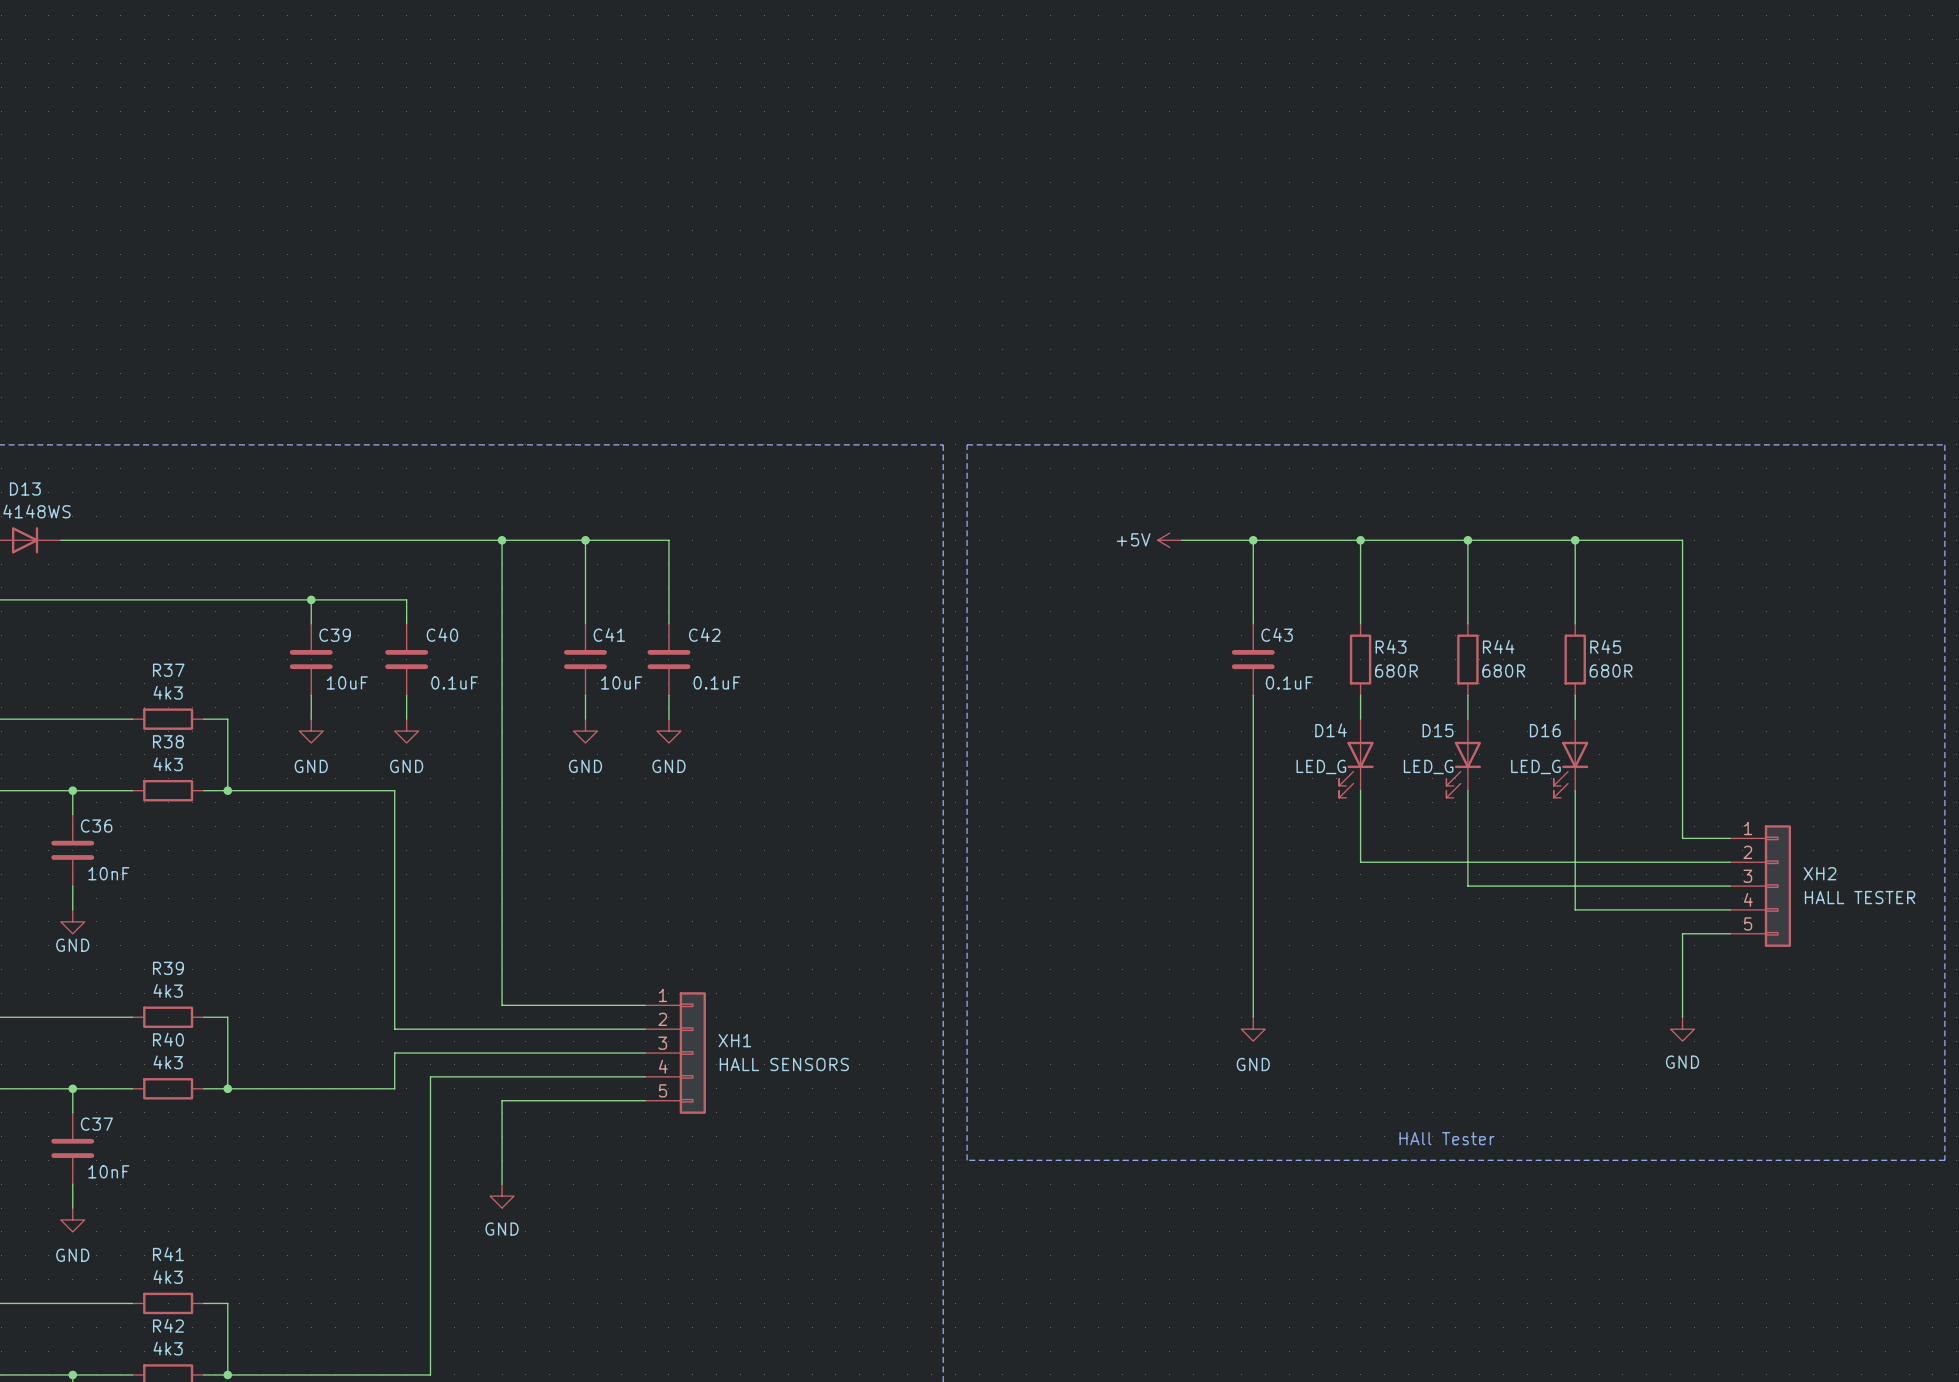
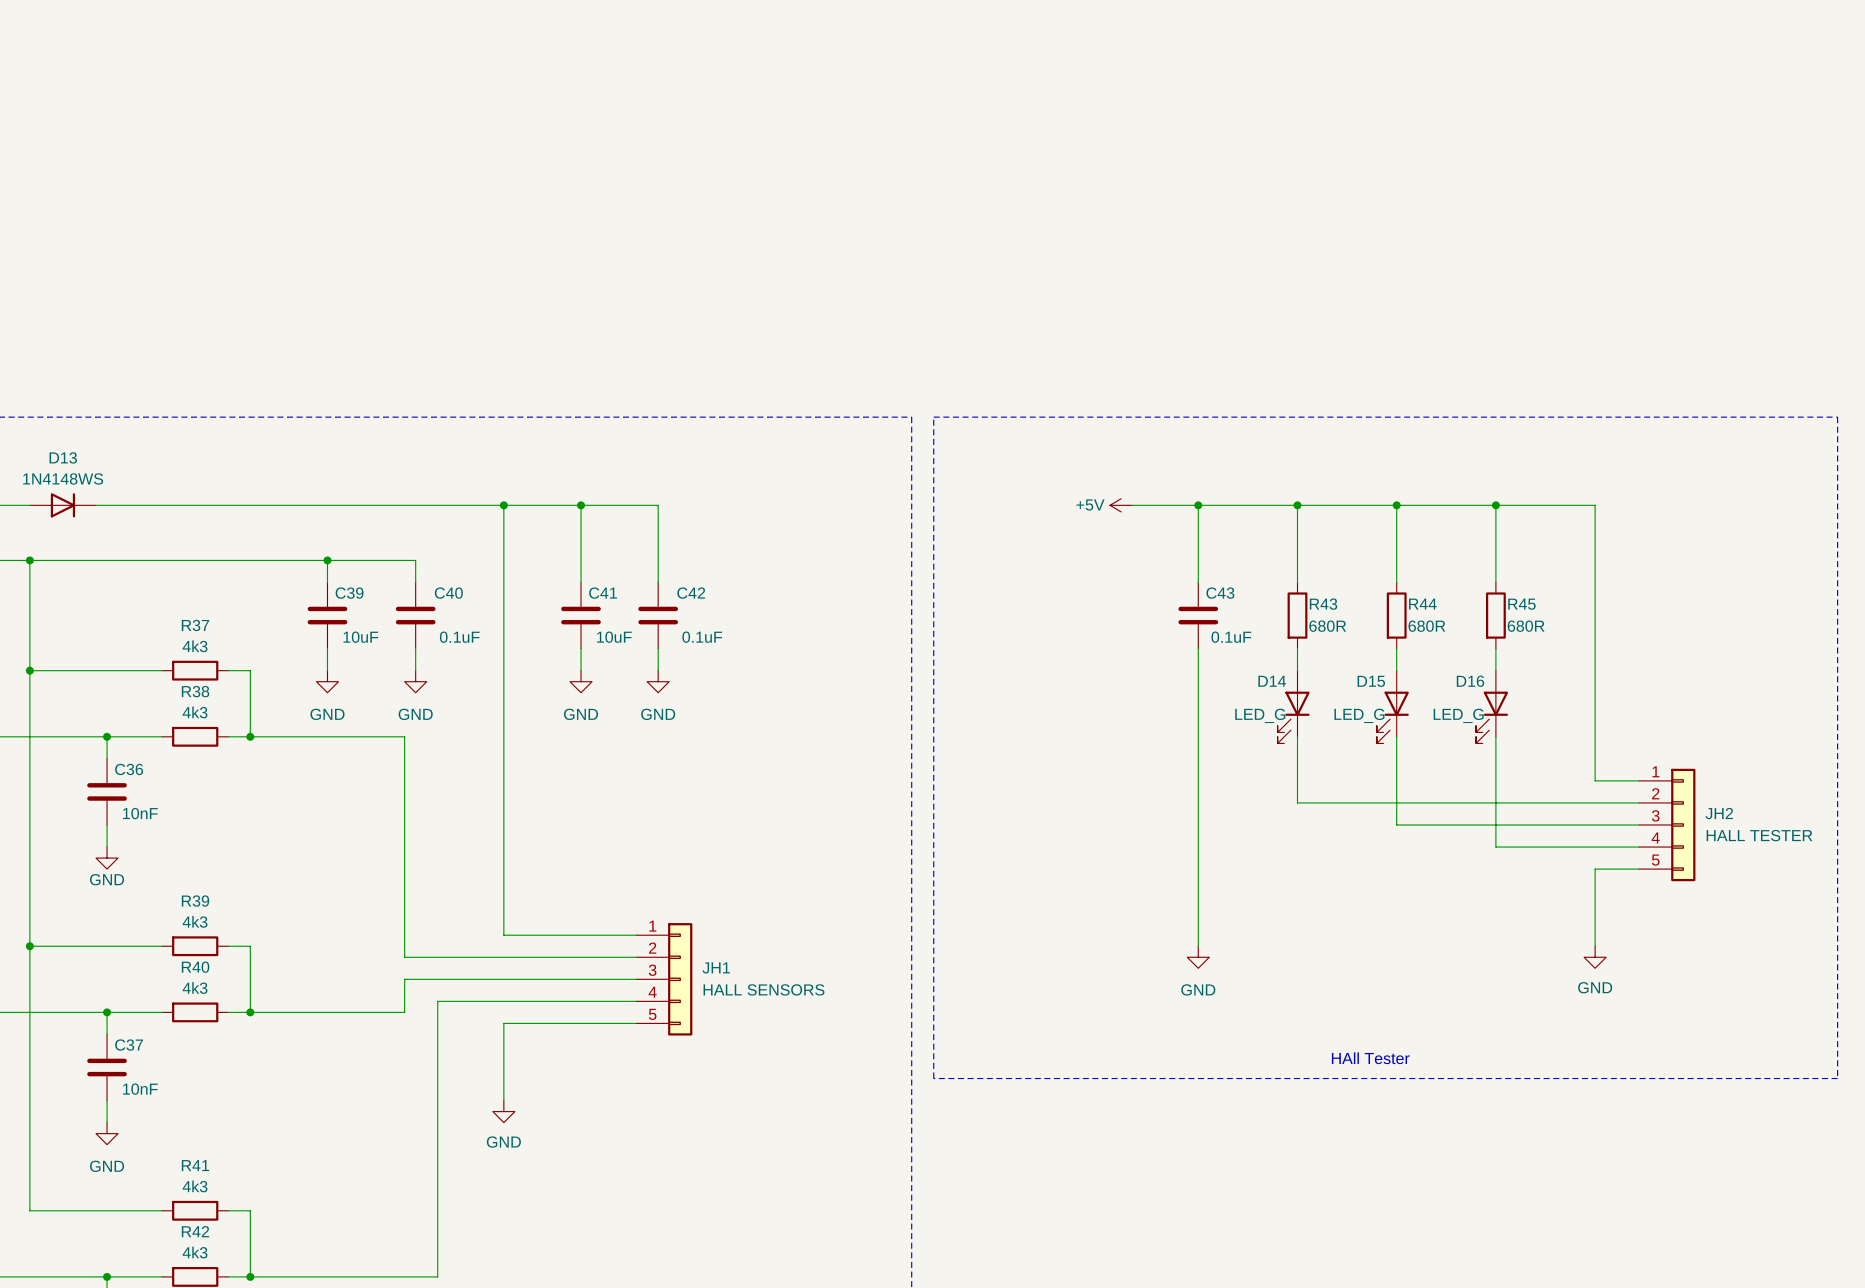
XH2 name: XH2 (1820, 873) -> JH2 (1719, 813)
XH1 name: XH1 (734, 1040) -> JH1 (716, 967)

